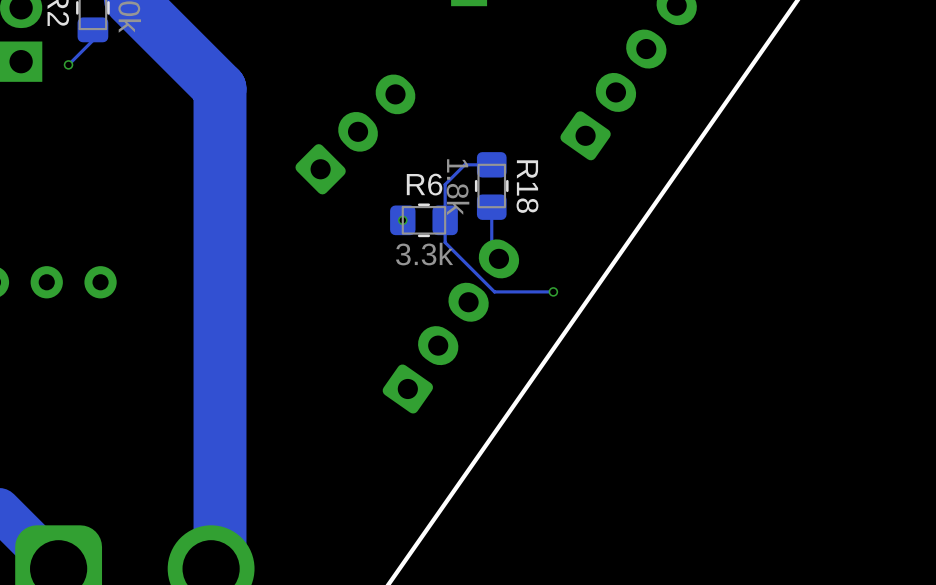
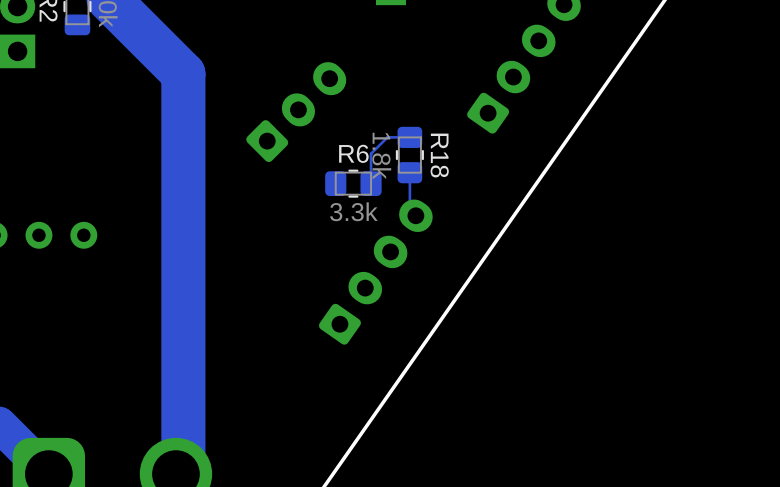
track: (92, 29) (92, 40) (68, 64) -> none
via: (68, 64) -> none
via: (402, 220) -> none
track: (445, 220) (445, 242) (494, 291) (553, 291) -> none
via: (553, 291) -> none

